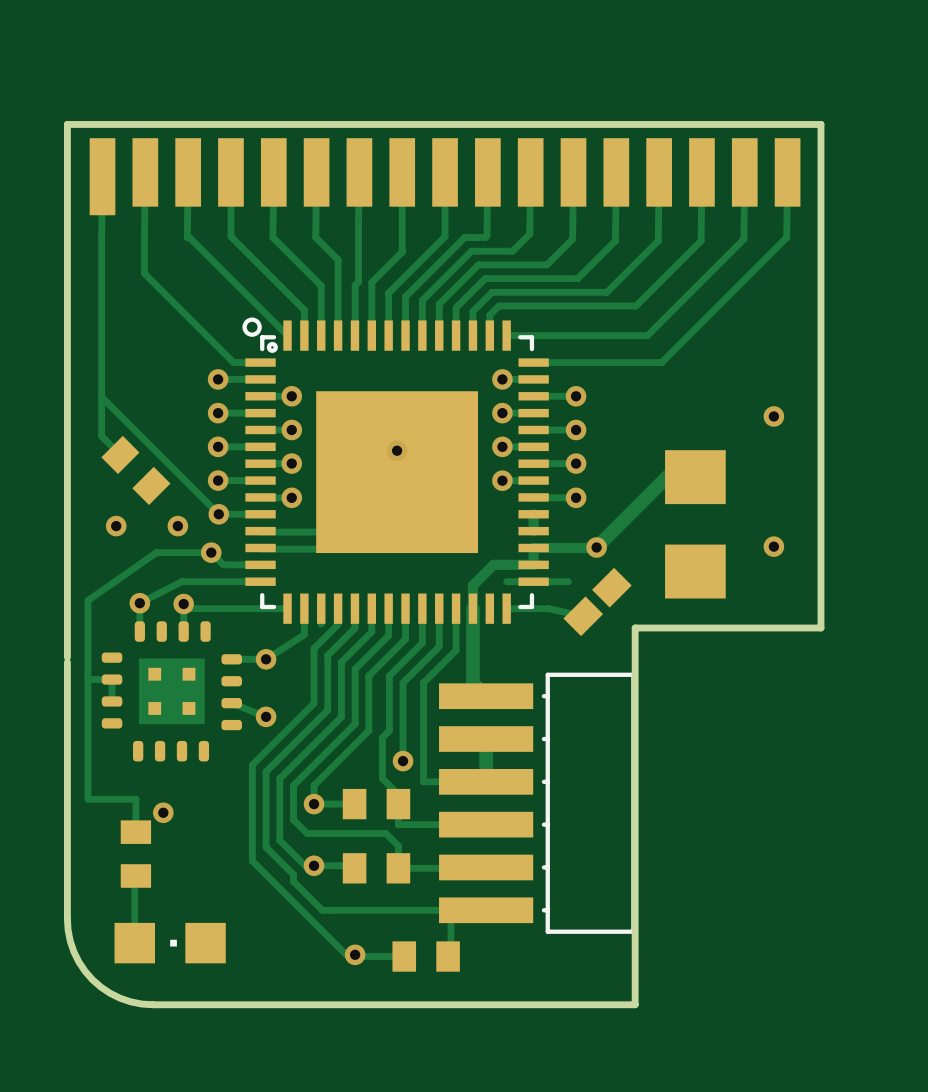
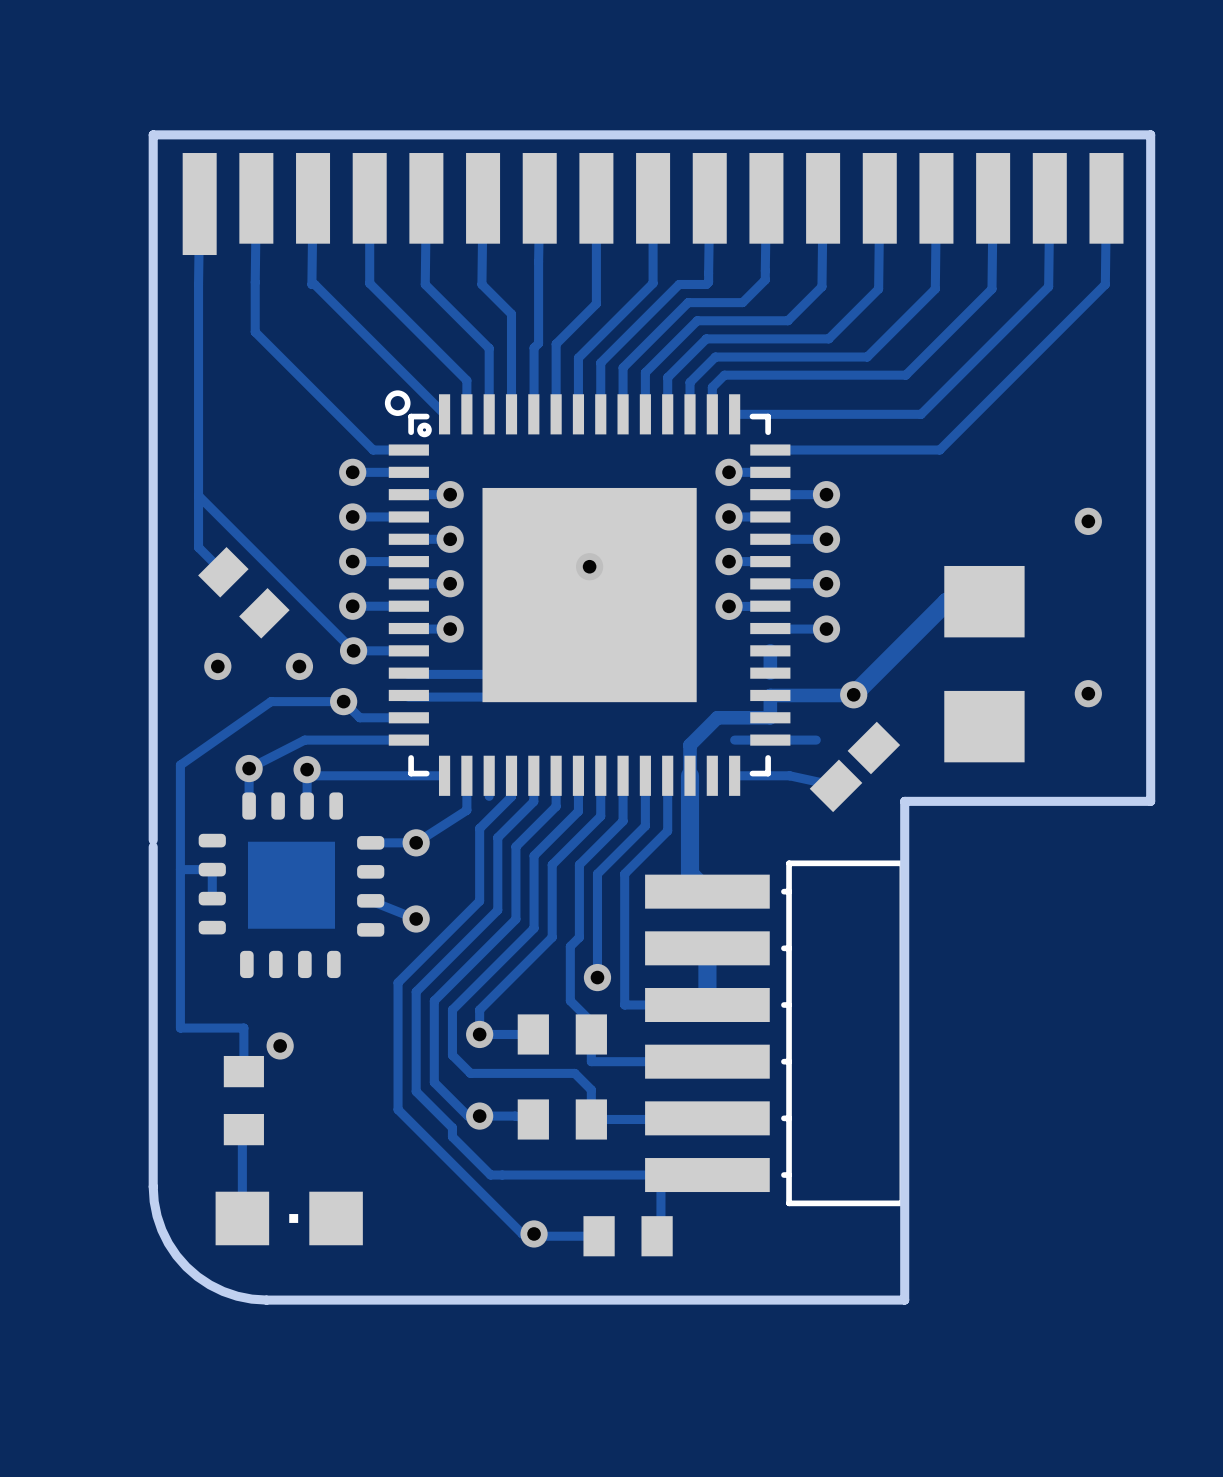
part footprint: [101, 621, 242, 762] -> [198, 792, 385, 979]

